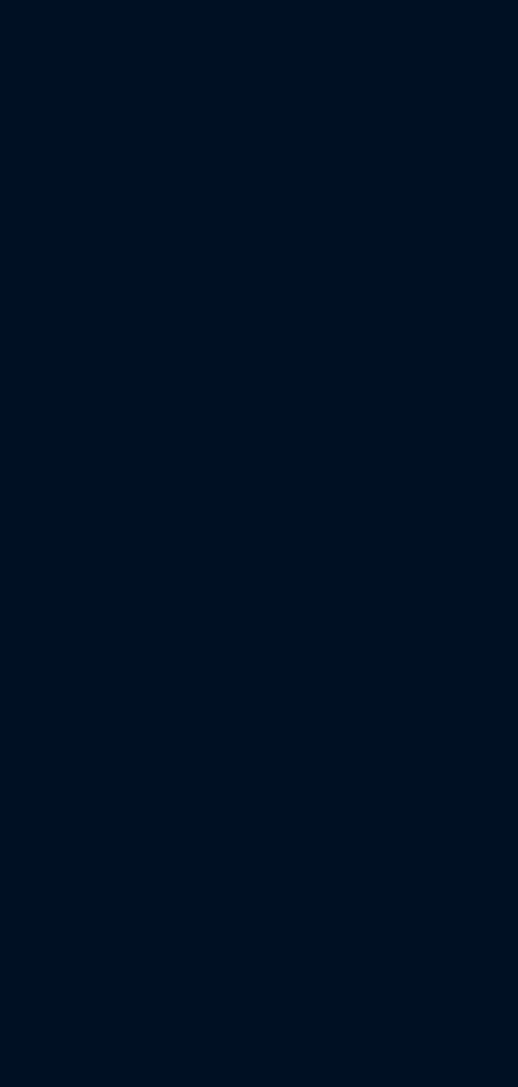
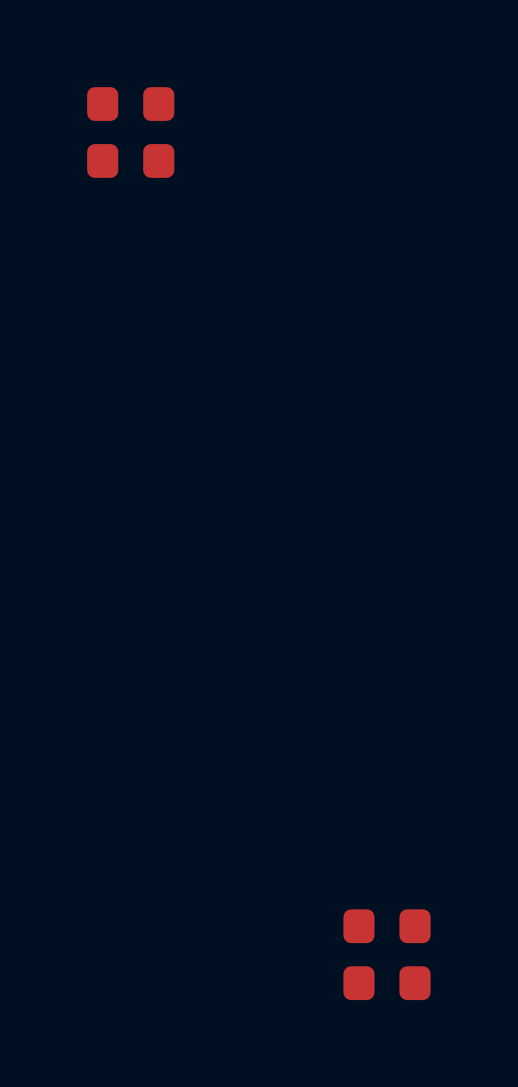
part: none -> (130, 104)
part: none -> (130, 160)
part: none -> (386, 926)
part: none -> (386, 983)

